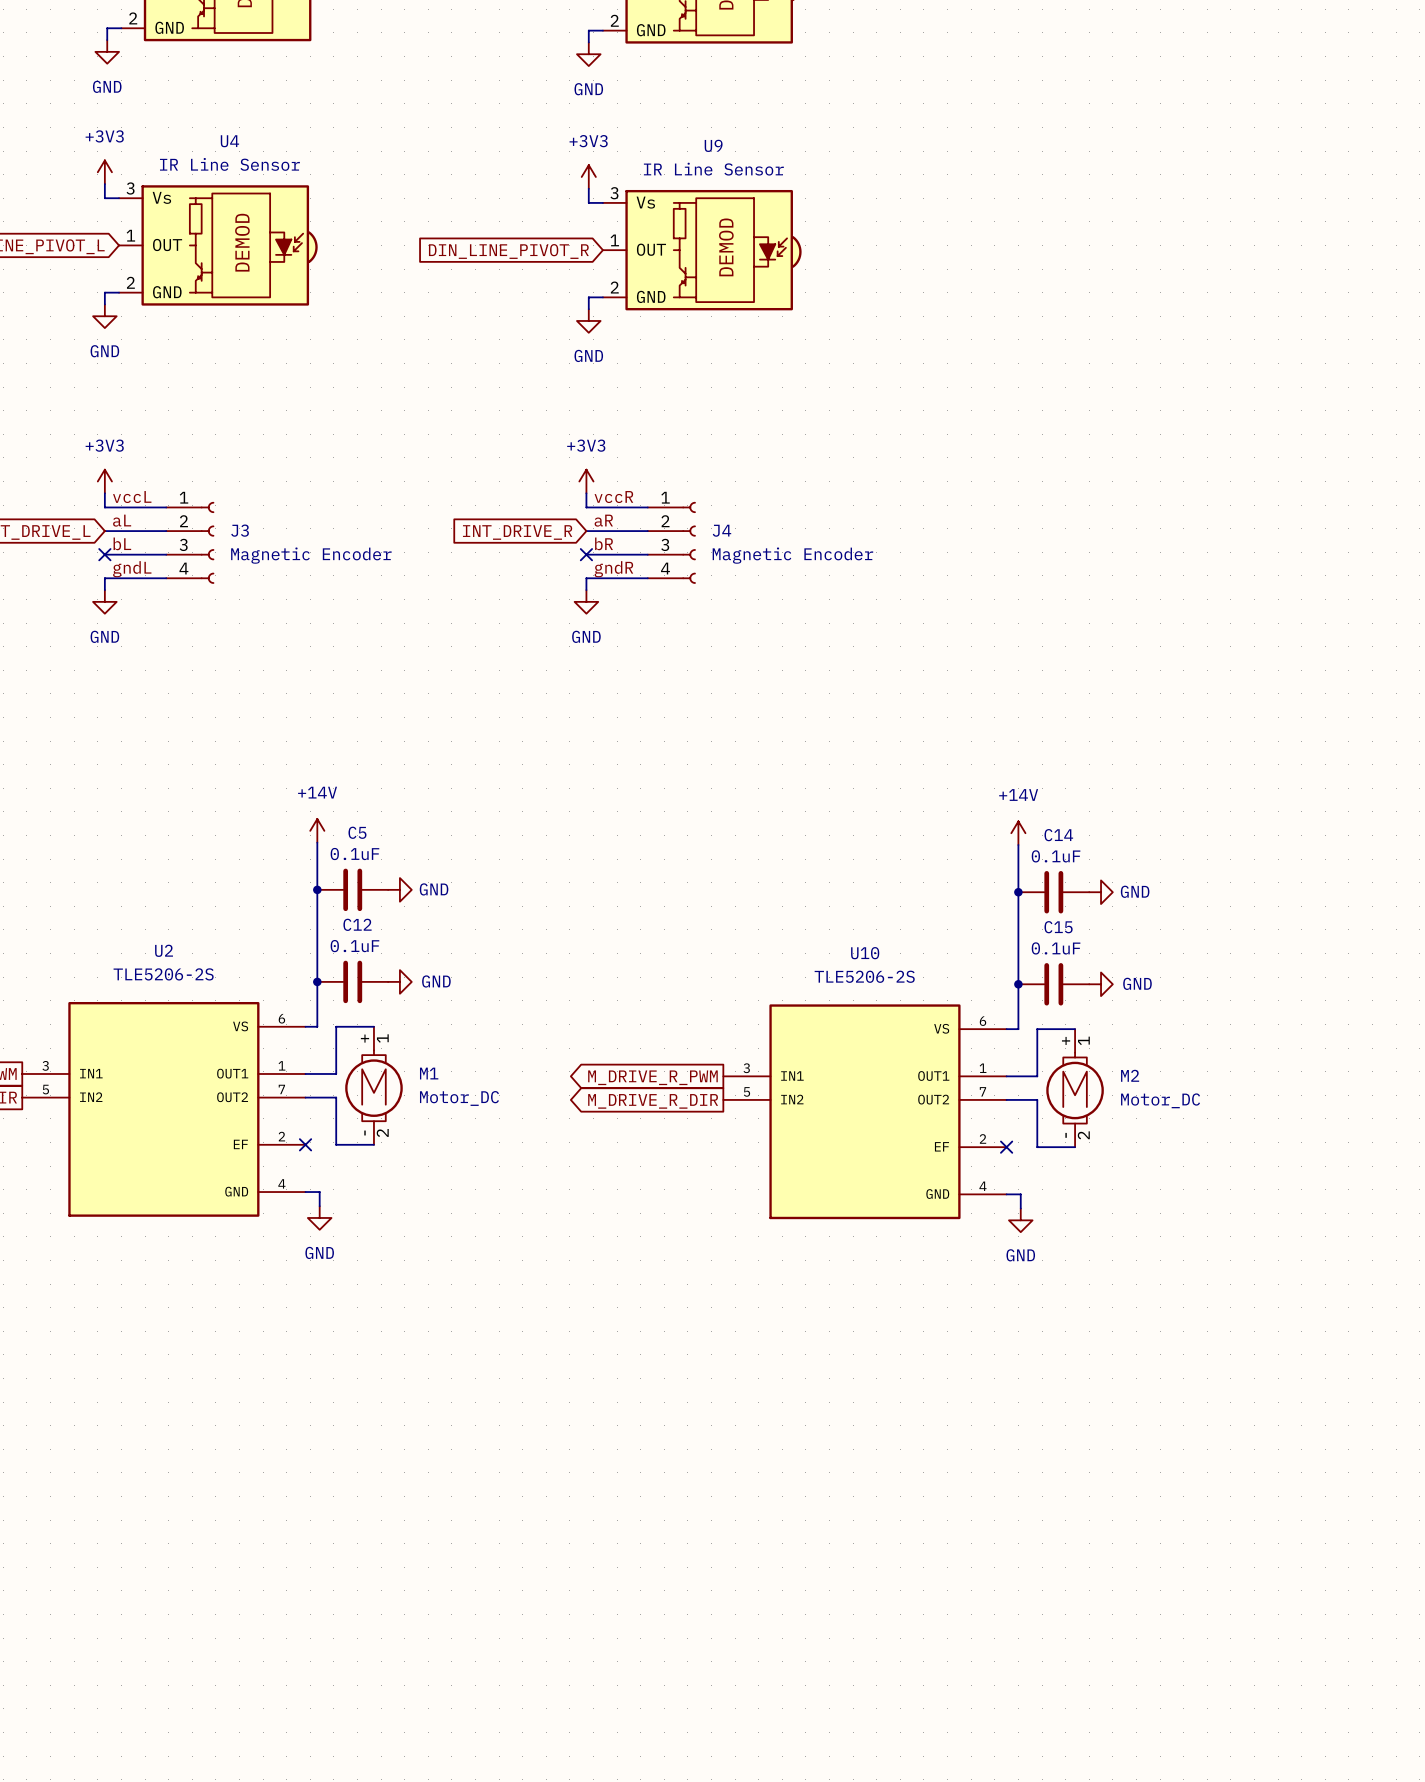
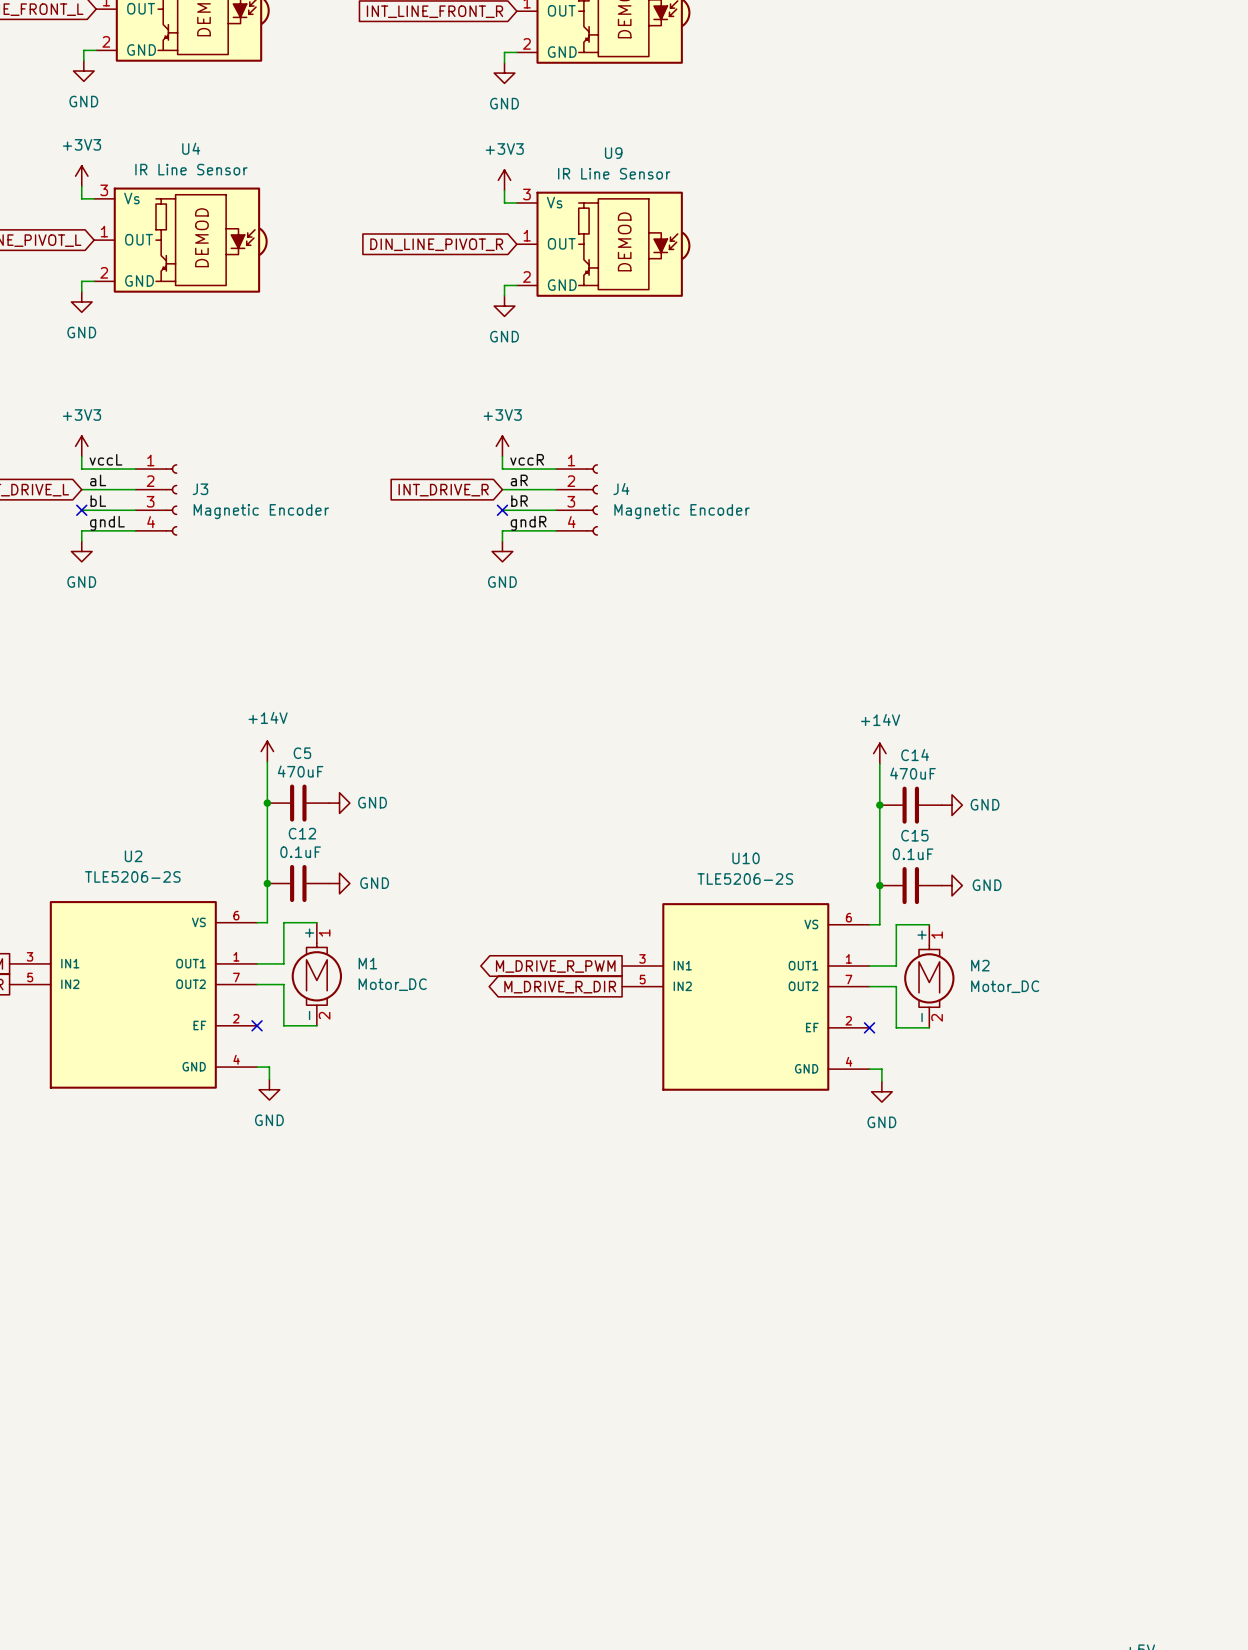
C5 value: 0.1uF (354, 854) -> 470uF (300, 771)
C14 value: 0.1uF (1056, 856) -> 470uF (913, 773)

